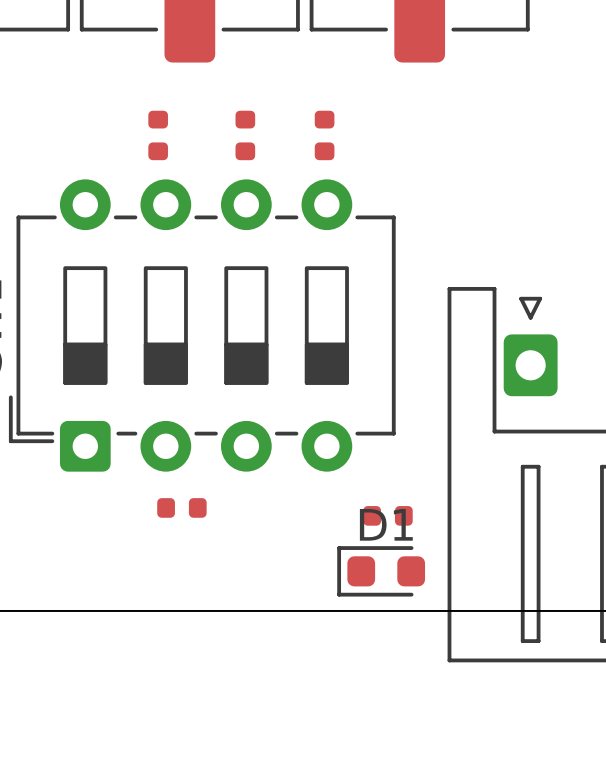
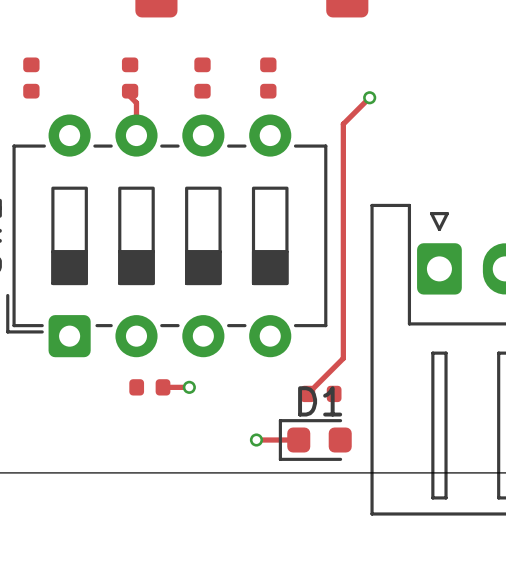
part: none -> (31, 78)
top track: none -> (130, 96) (136, 102) (136, 135)
top track: none -> (369, 97) (343, 124) (343, 358) (307, 393)
via: none -> (369, 97)
top track: none -> (163, 387) (189, 387)
via: none -> (189, 387)
top track: none -> (256, 440) (298, 440)
via: none -> (256, 440)

